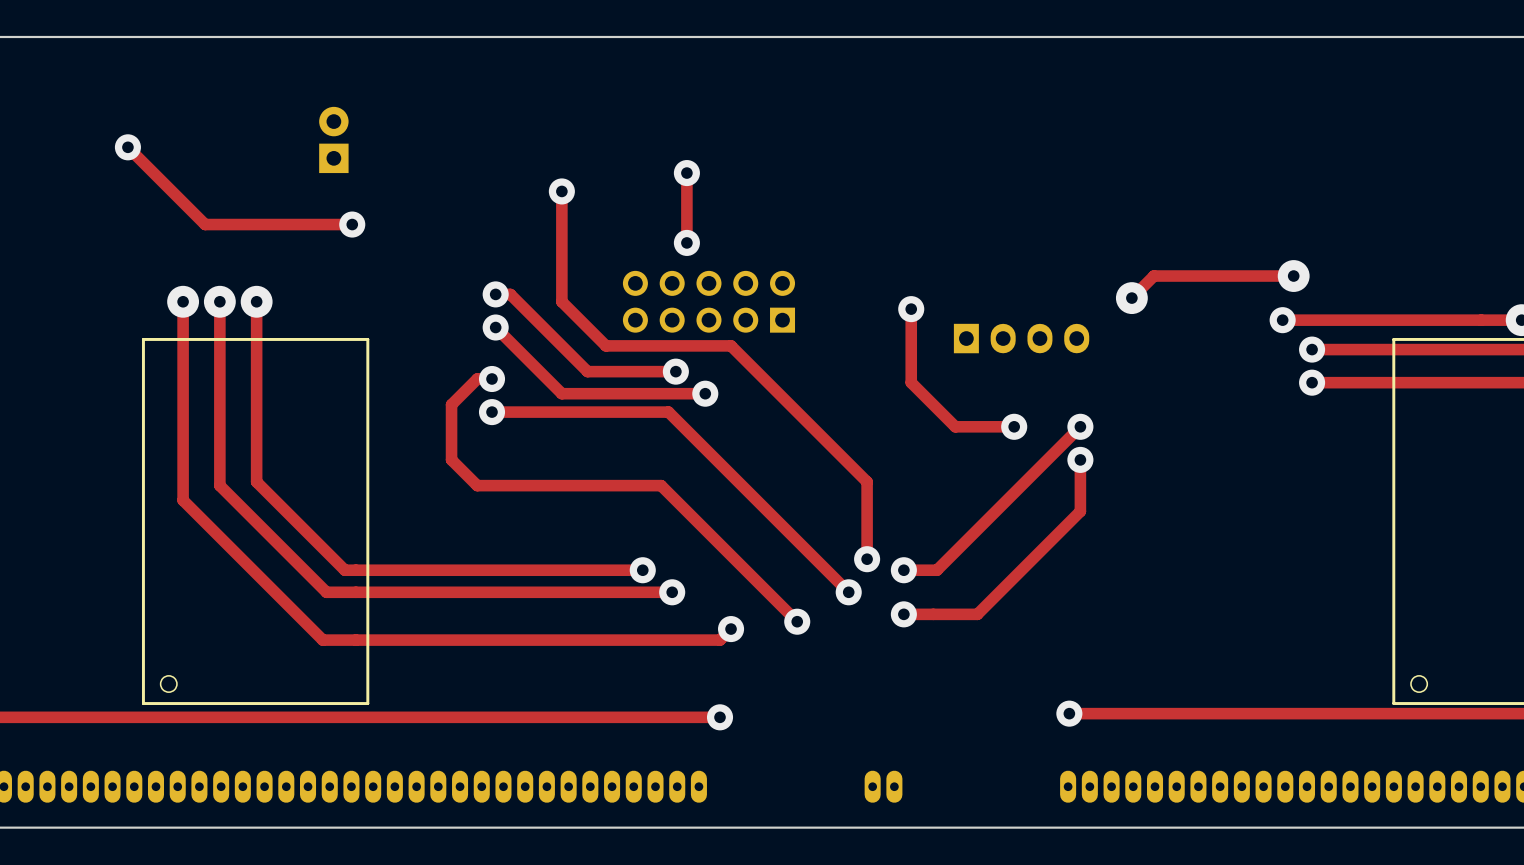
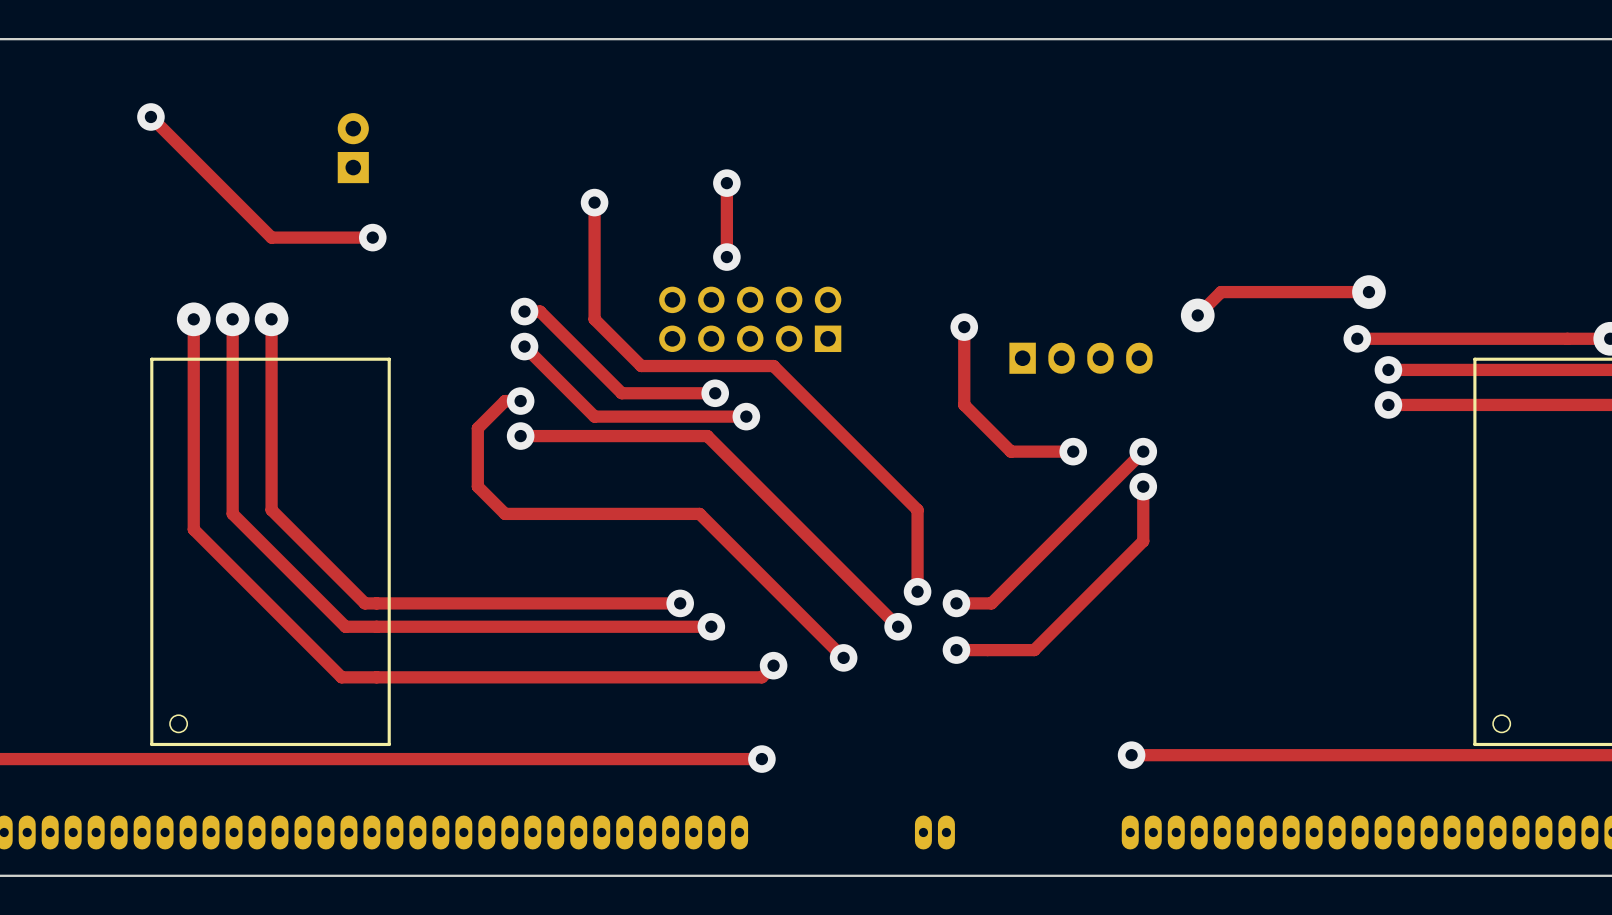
track: (127, 147) (205, 224) (256, 224) -> (150, 116) (271, 237)
via position: (127, 147) -> (150, 116)

